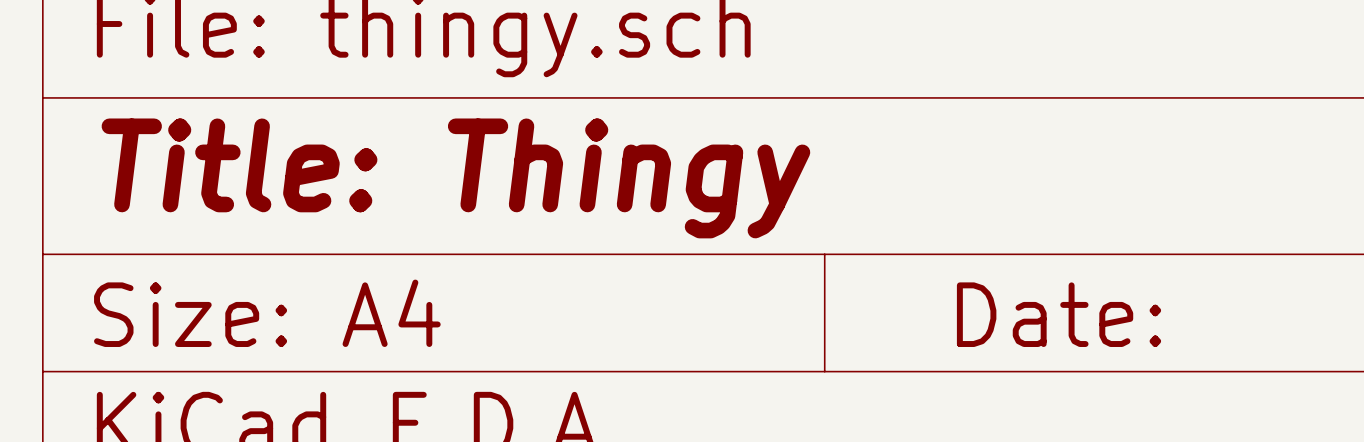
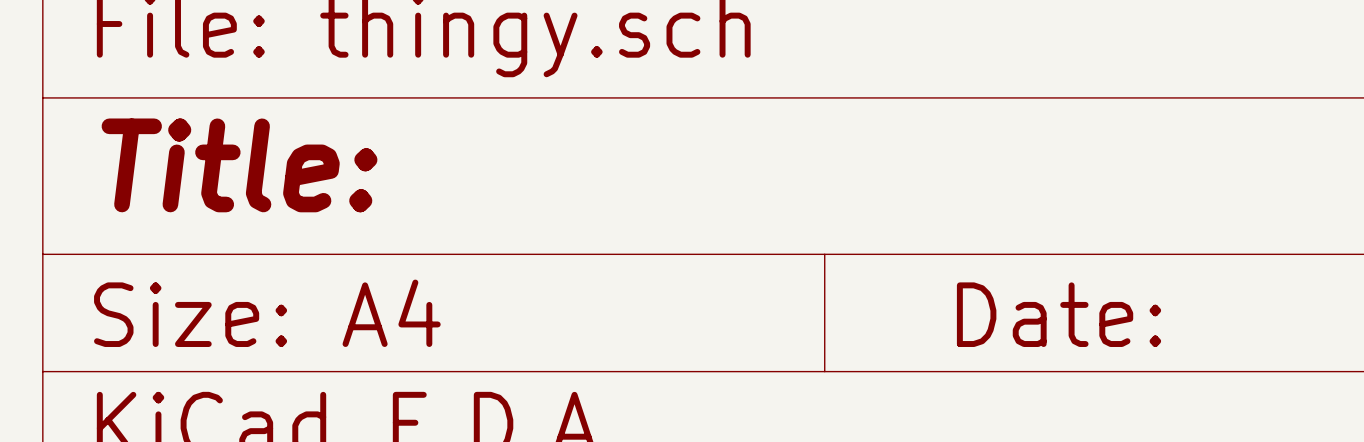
title block: Title: Thingy (455, 178) -> Title: (239, 165)

